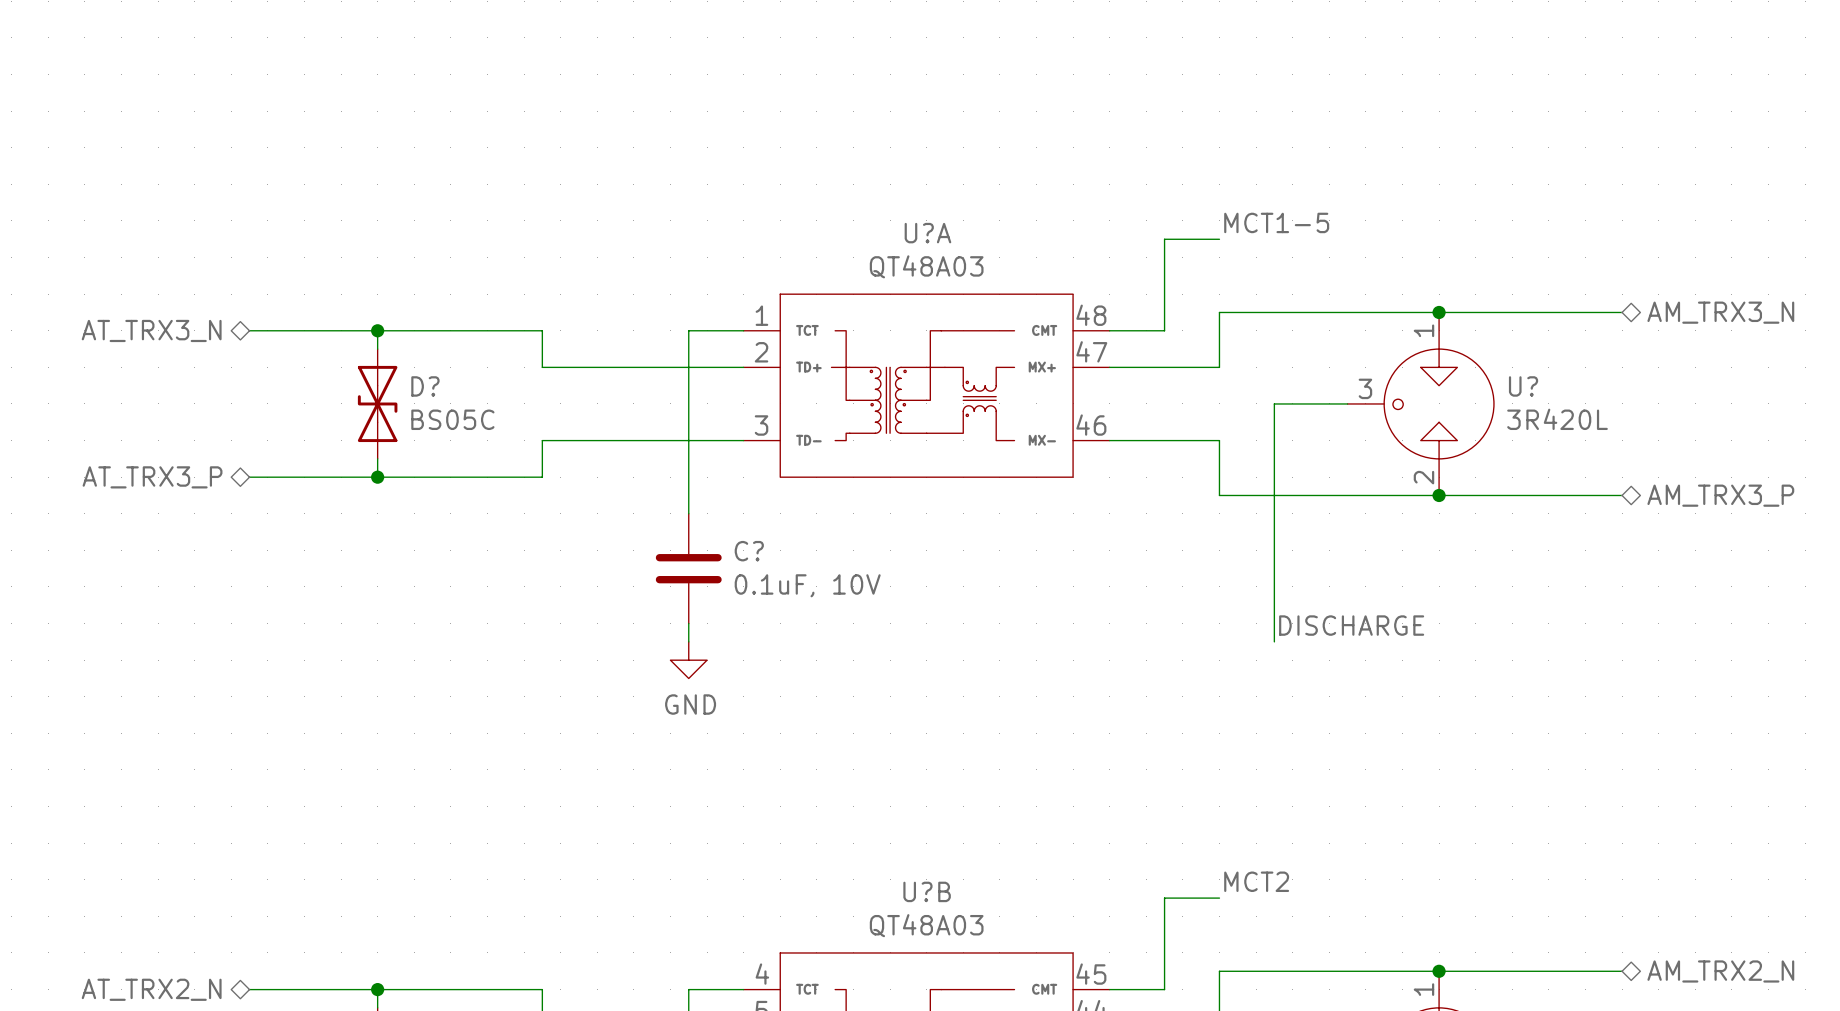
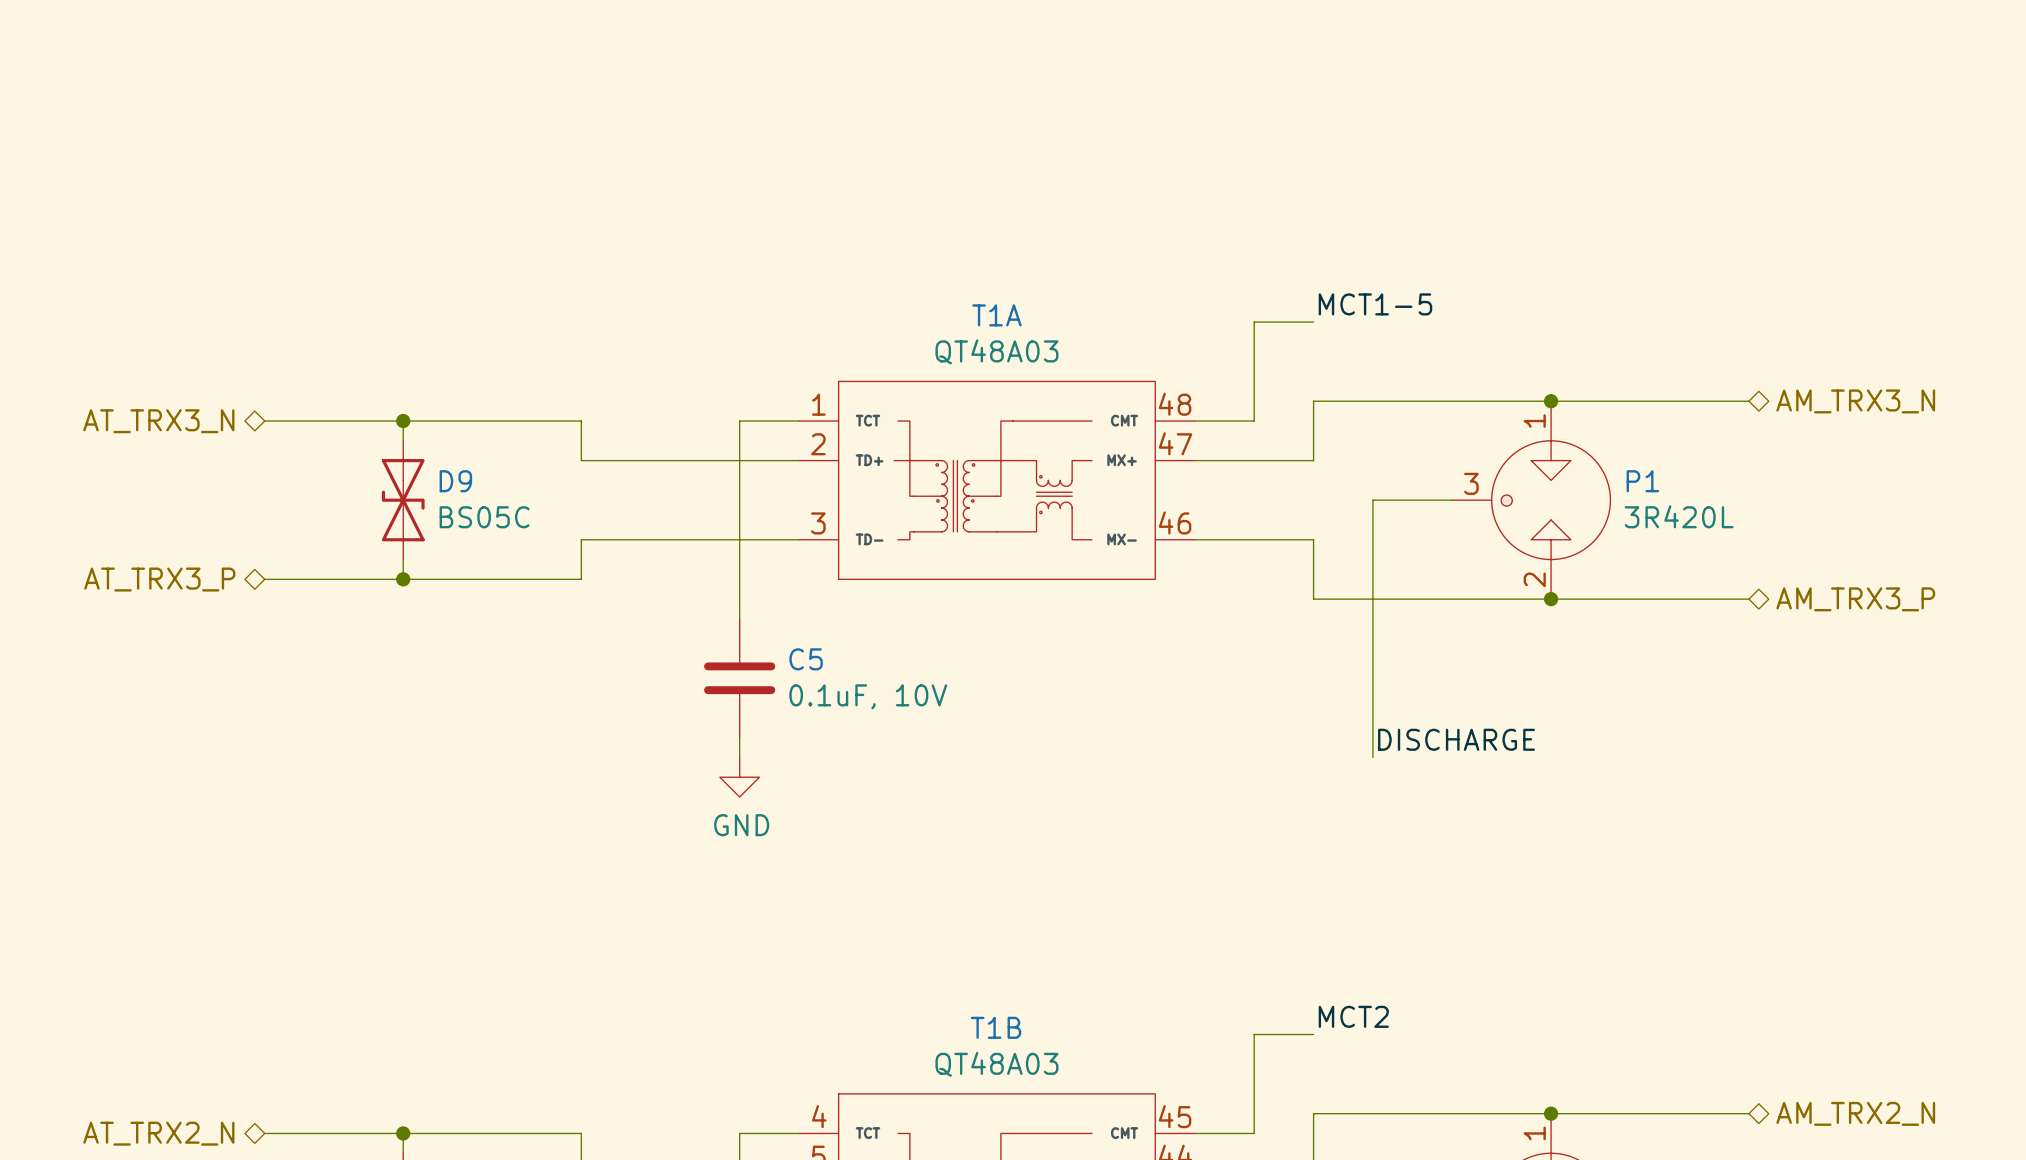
U?A name: U?A (927, 233) -> T1A (996, 315)
D? name: D? (425, 386) -> D9 (455, 481)
U? name: U? (1523, 386) -> P1 (1642, 481)
C? name: C? (749, 551) -> C5 (806, 659)
U?B name: U?B (927, 891) -> T1B (996, 1027)

